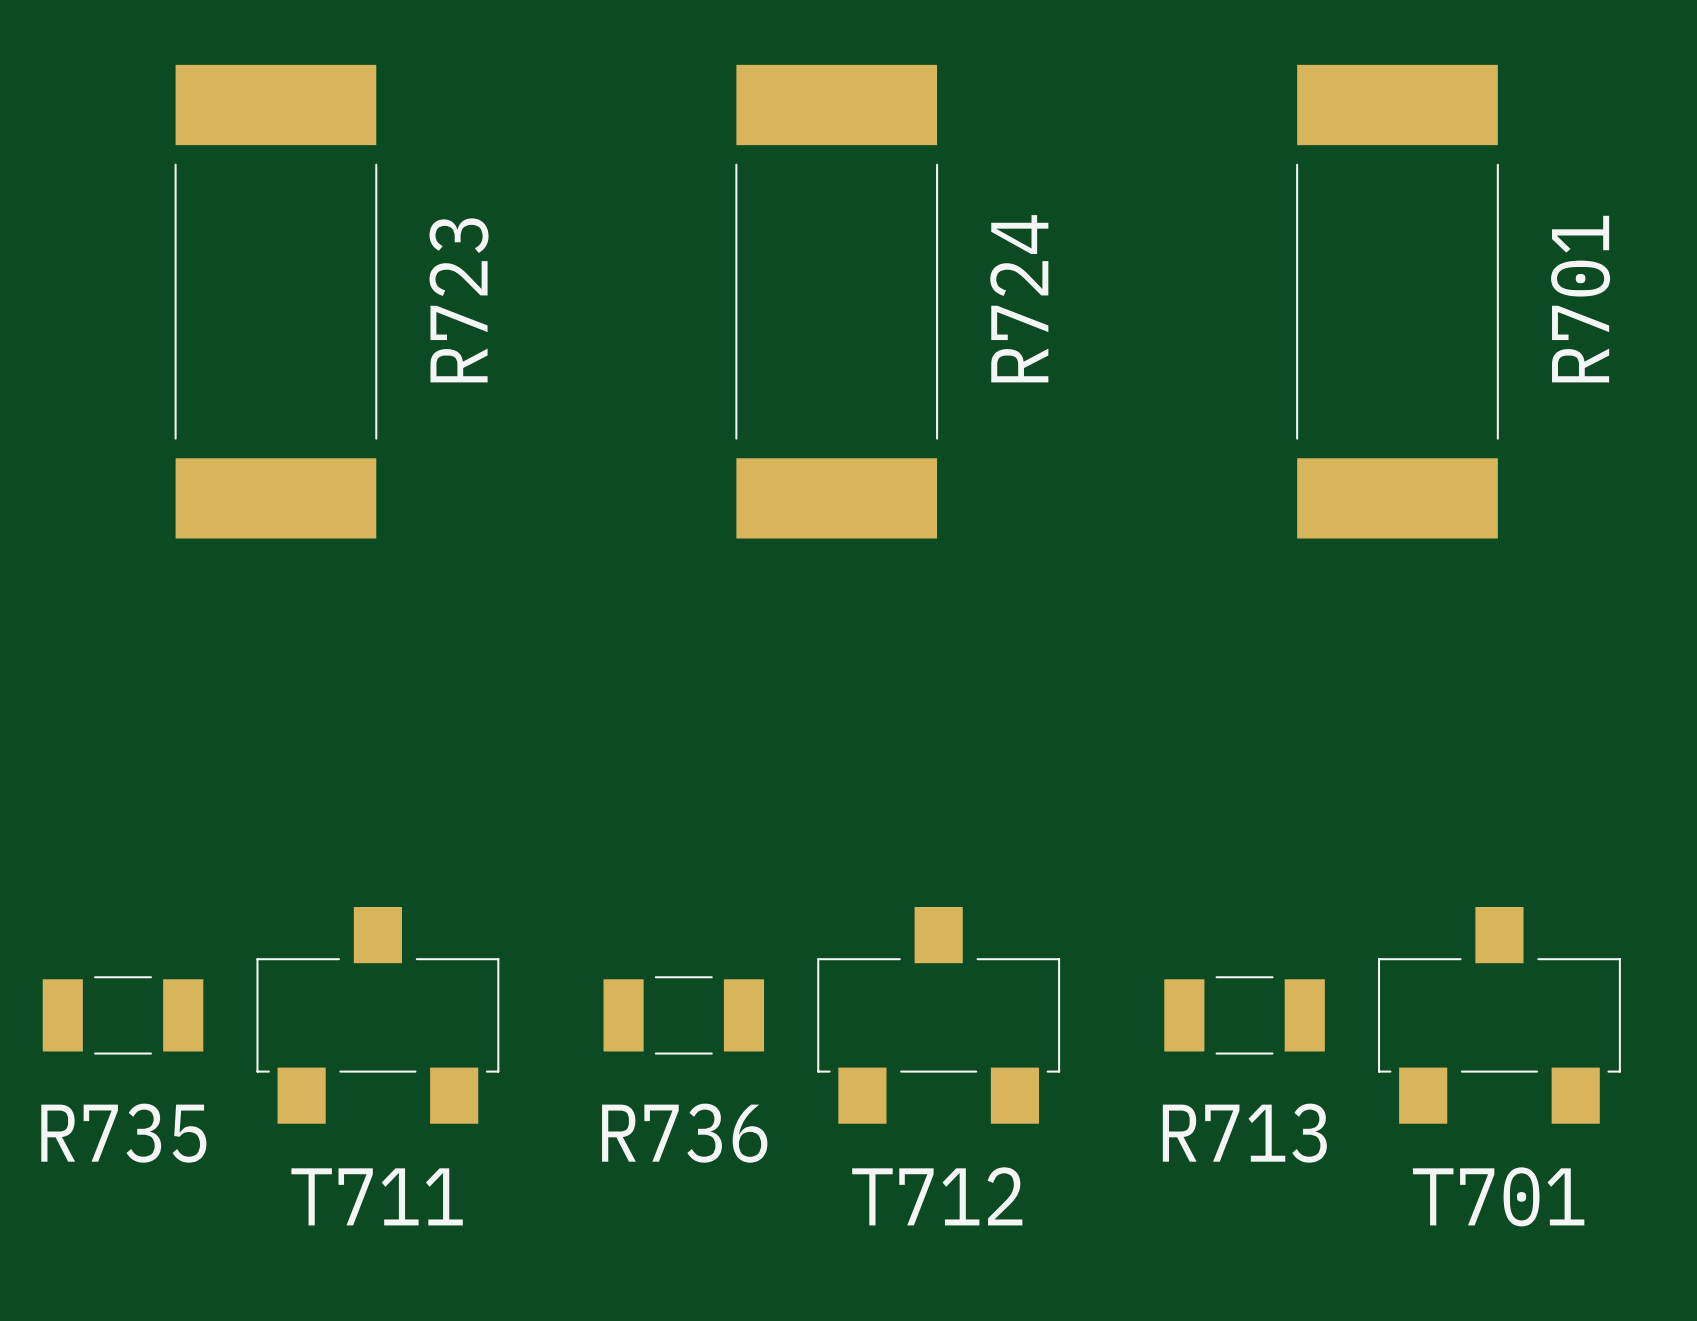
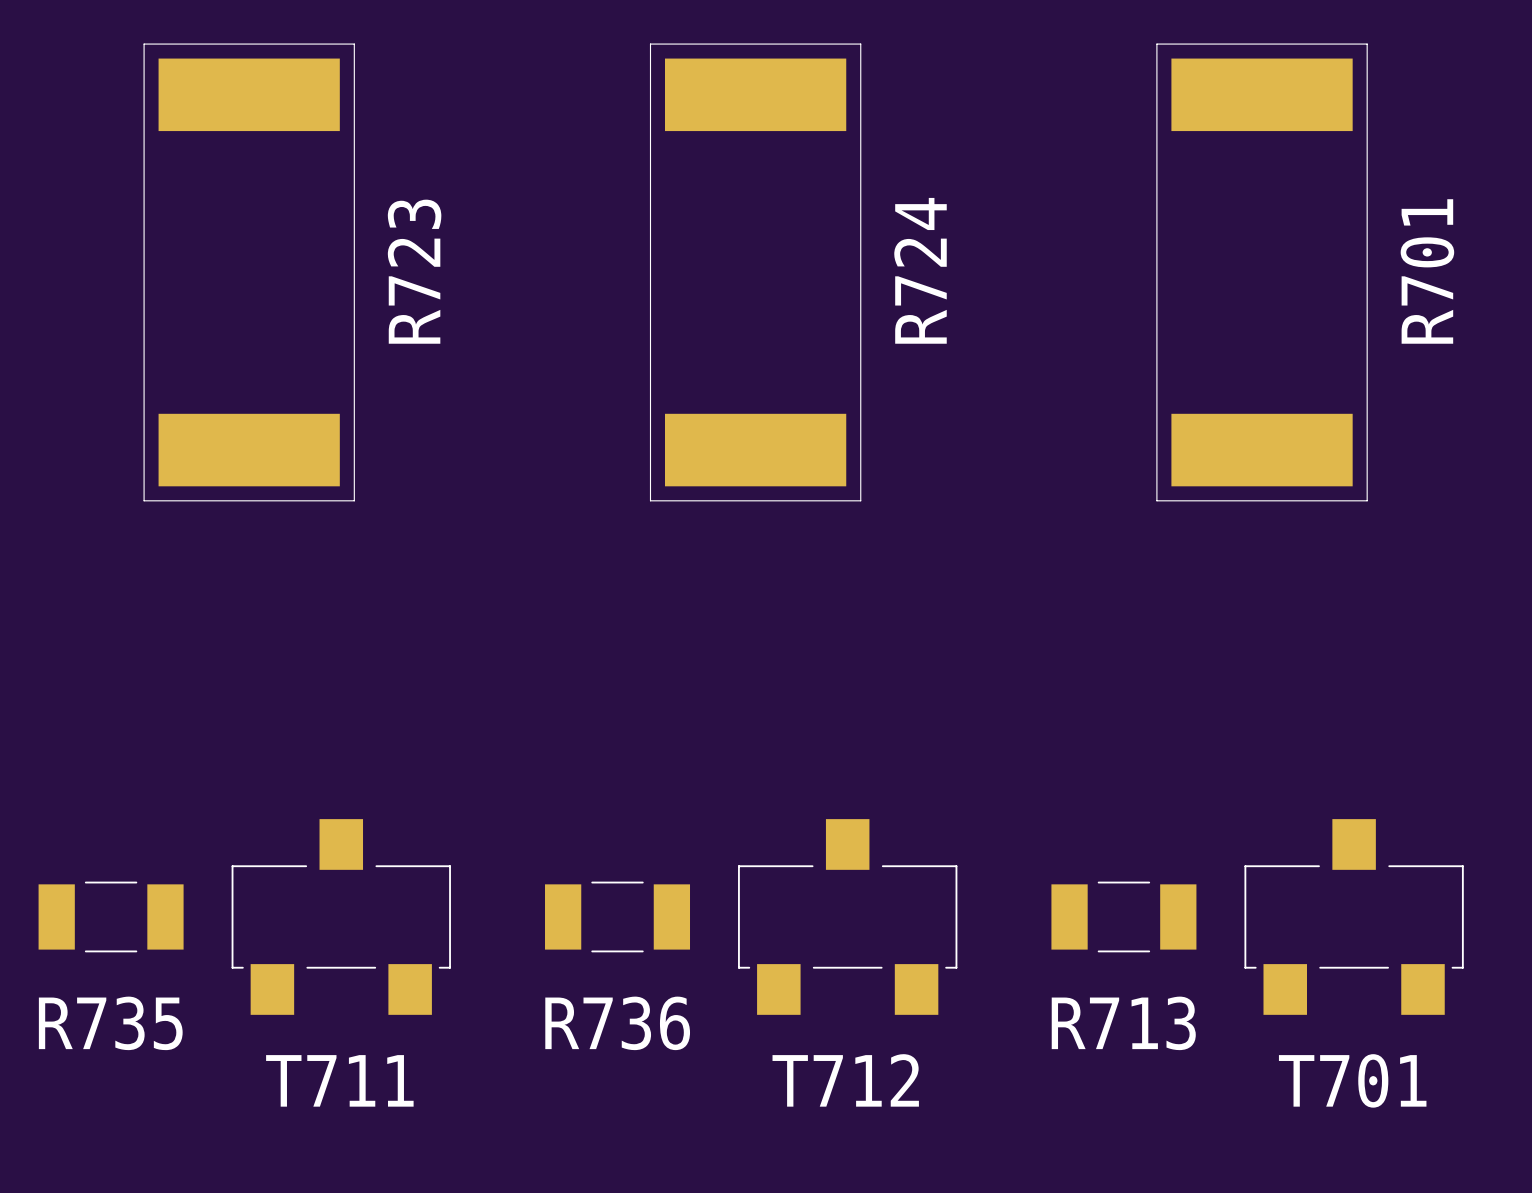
R723 footprint: [174, 64, 378, 539] -> [144, 44, 355, 501]
R724 footprint: [735, 64, 939, 539] -> [650, 44, 861, 501]
R701 footprint: [1296, 64, 1499, 539] -> [1156, 44, 1368, 501]

